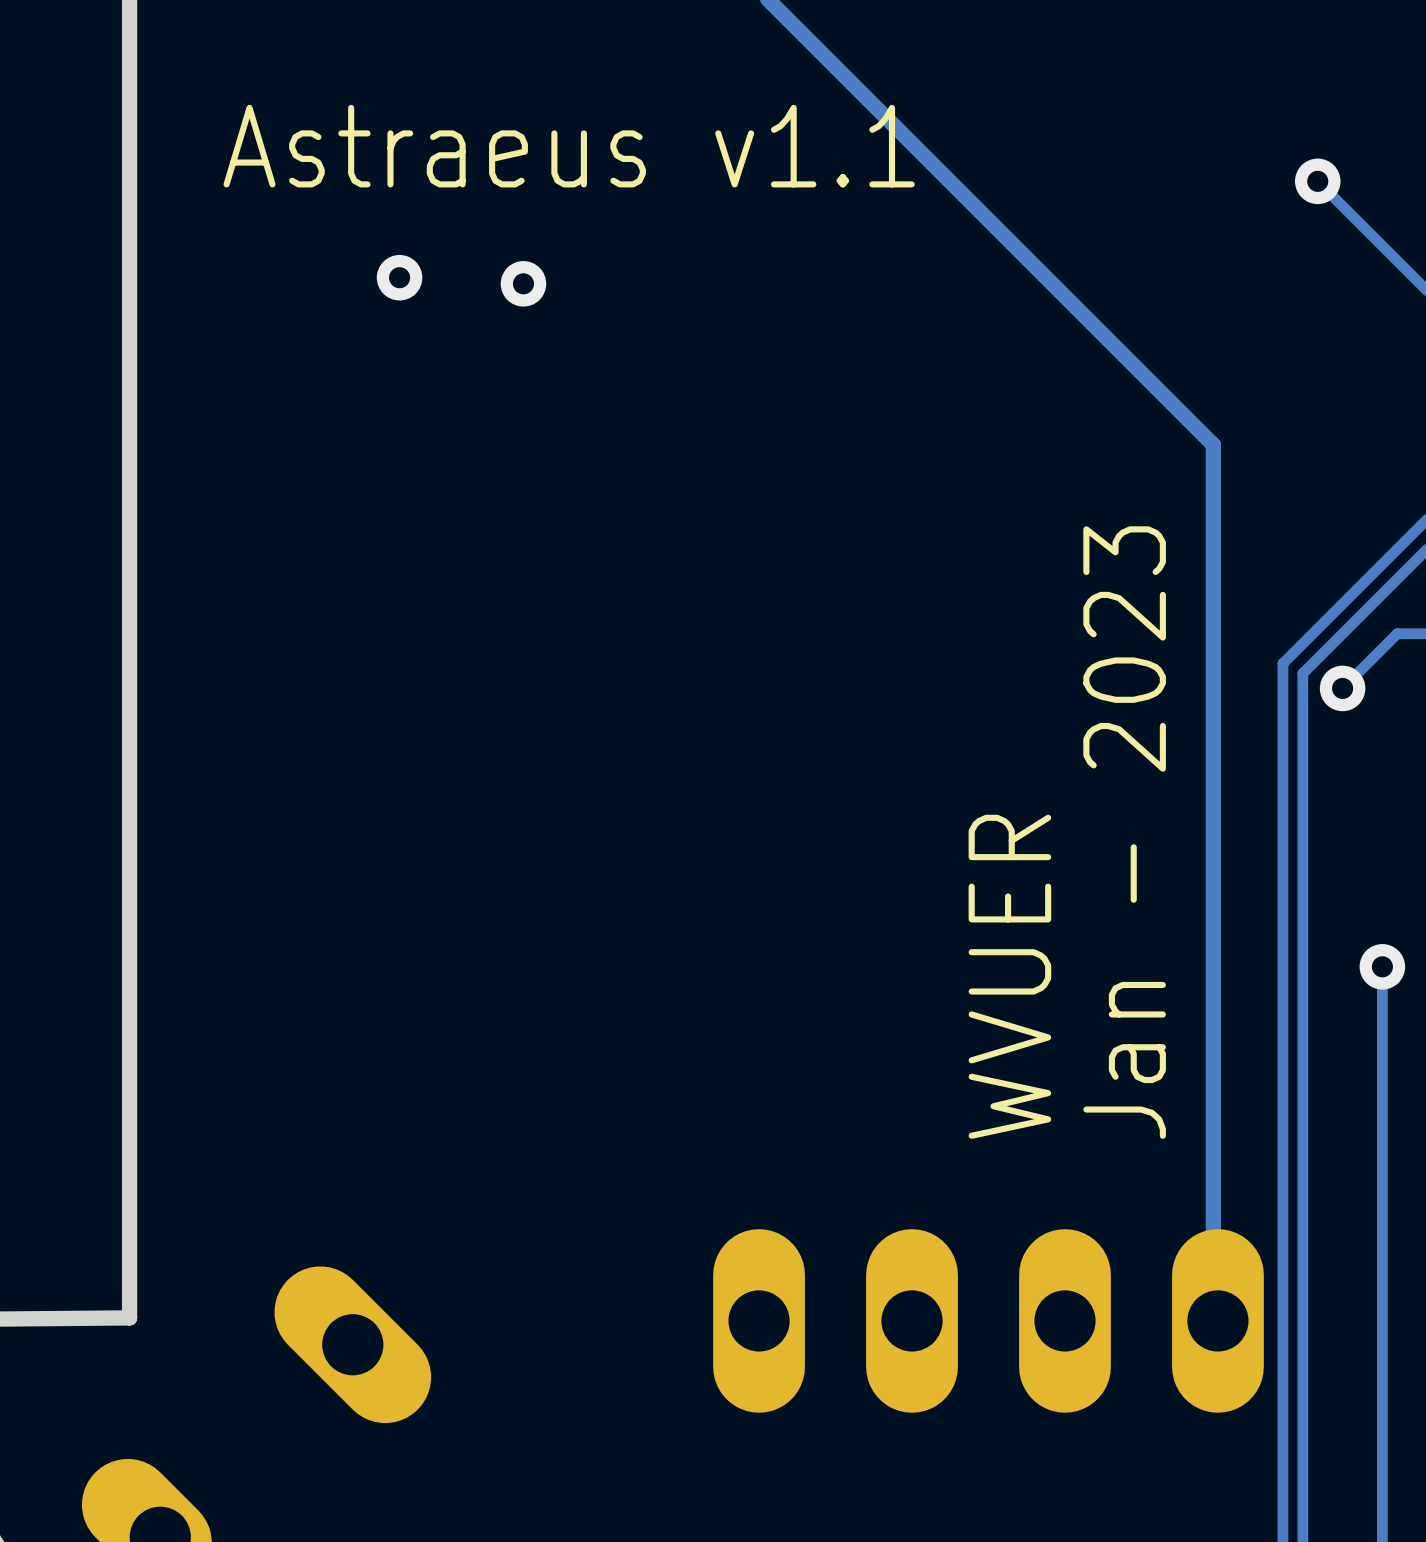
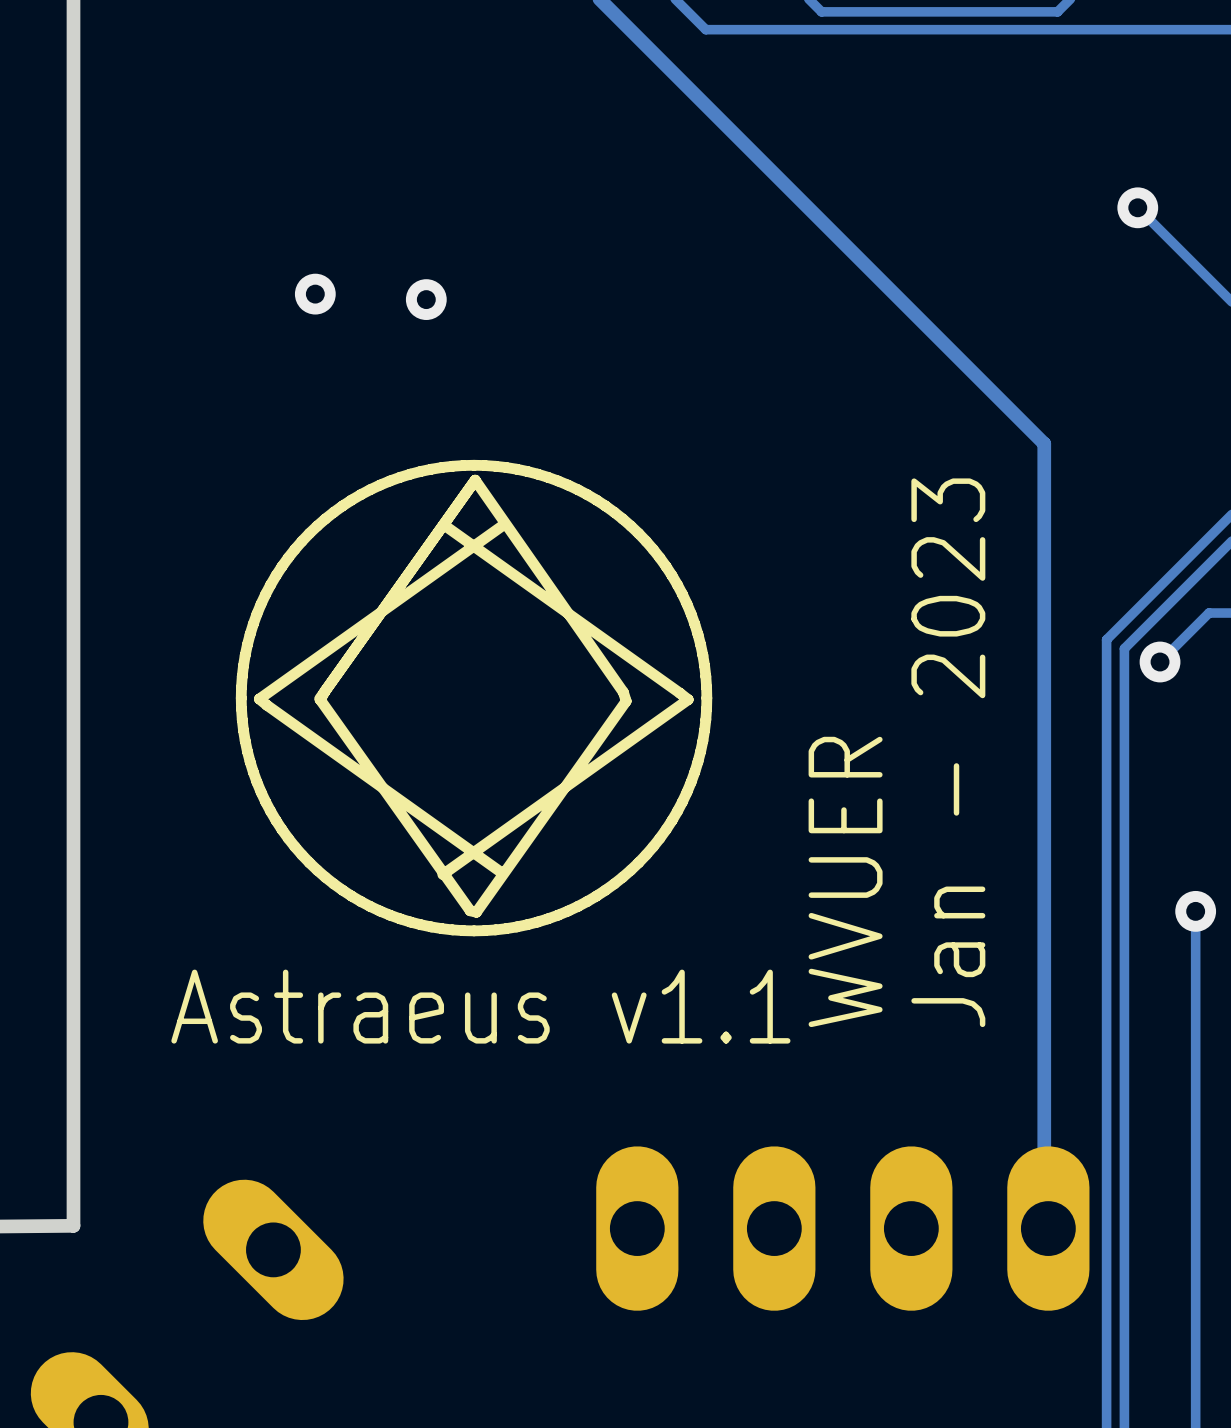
text position: Astraeus v1.1 (569, 146) -> Astraeus v1.1 (480, 1006)
line: none -> (474, 465) (516, 469) (568, 485) (605, 506) (638, 533) (666, 566) (691, 613) (702, 655) (706, 698) (702, 740) (687, 792) (666, 829) (638, 862) (605, 890) (558, 915) (516, 926) (474, 930) (431, 926) (380, 911) (342, 890) (309, 862) (281, 829) (256, 782) (245, 740) (241, 698) (245, 655) (261, 604) (281, 566) (309, 533) (342, 506) (389, 481) (431, 469) (474, 465)
line: none -> (443, 524) (688, 699) (442, 874)
line: none -> (503, 524) (259, 699) (502, 873)
line: none -> (325, 691) (320, 699) (470, 910) (476, 912) (626, 701) (623, 692) (475, 480) (319, 698)
text position: Jan - 2023 (1124, 832) -> Jan - 2023 (948, 752)
text position: WVUER (1009, 976) -> WVUER (845, 881)

